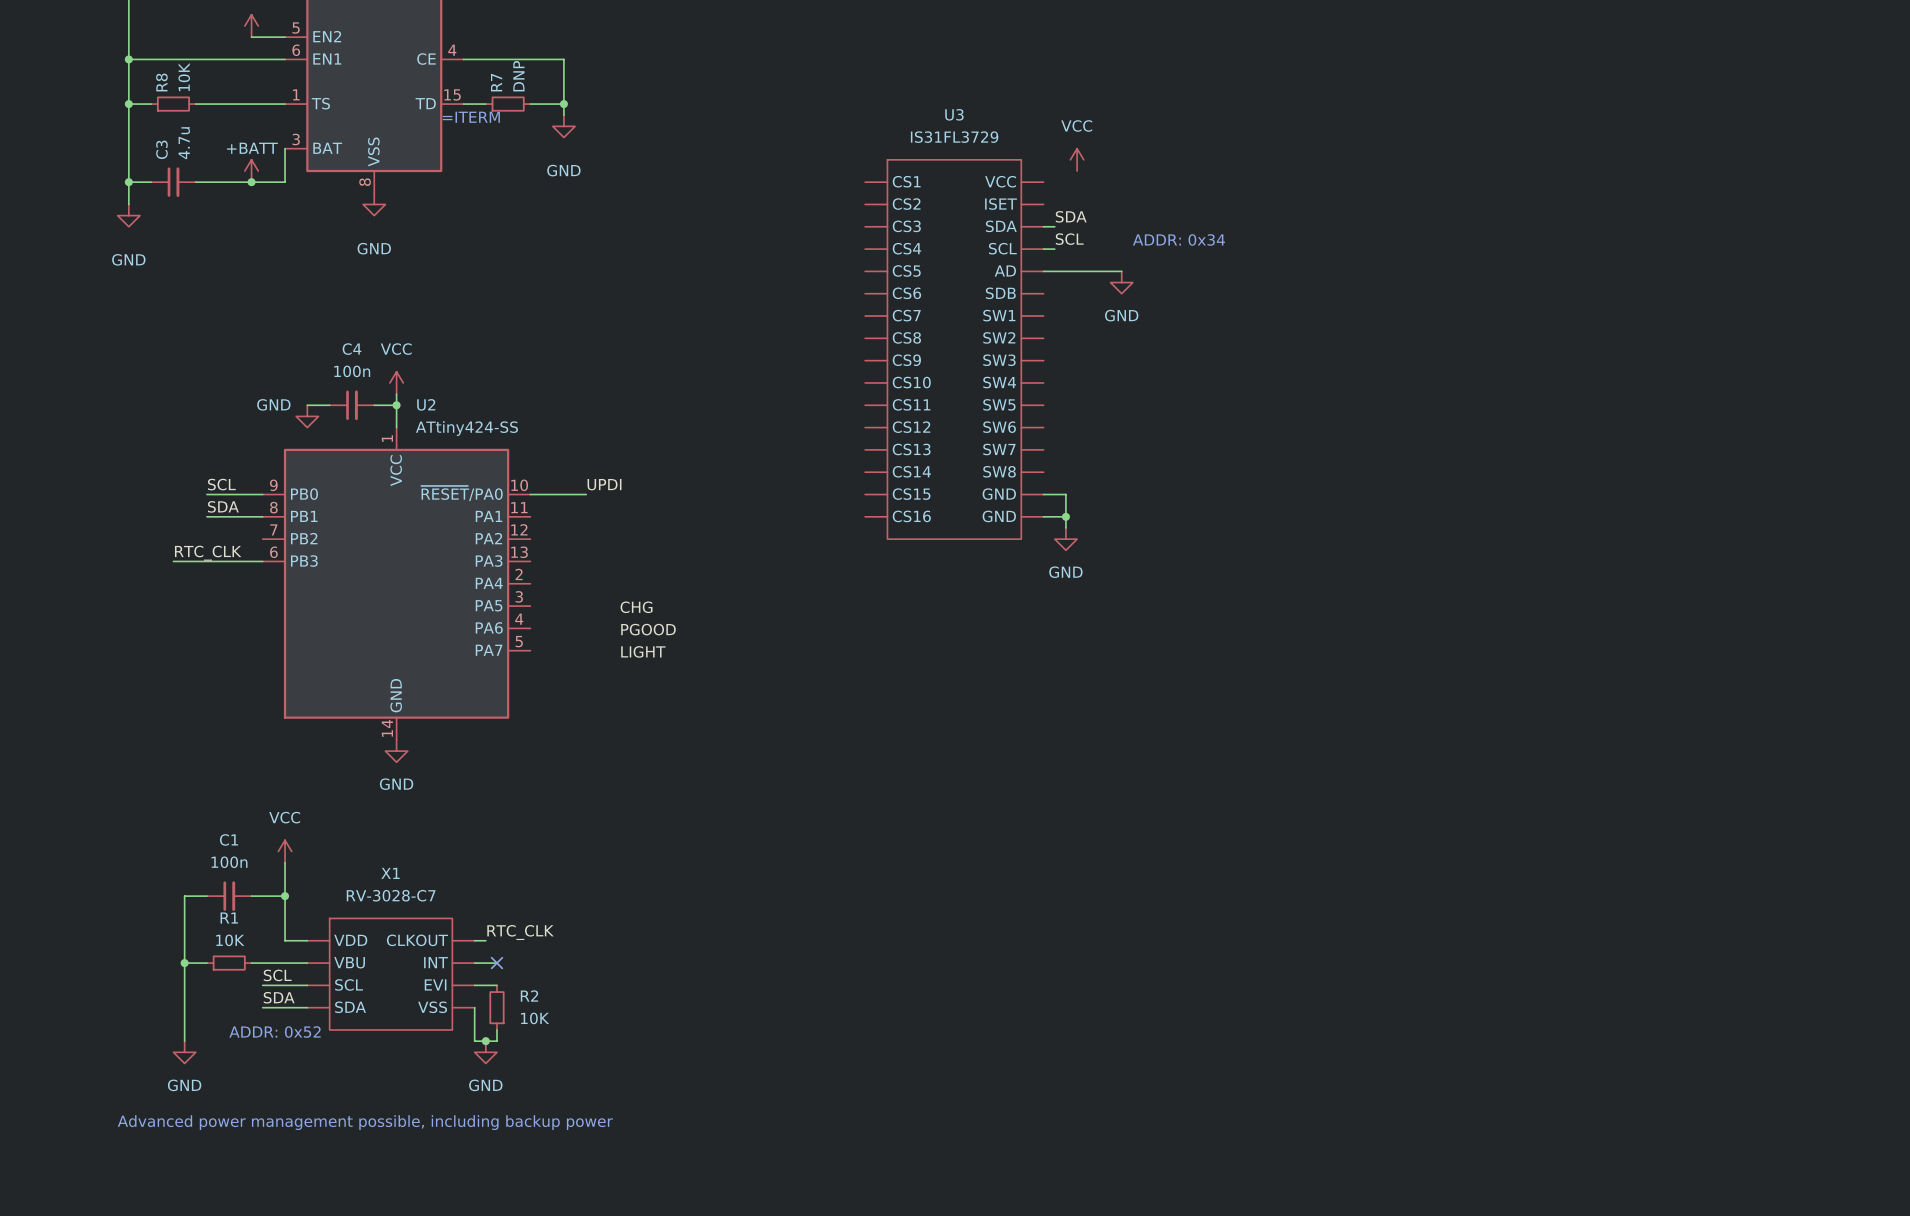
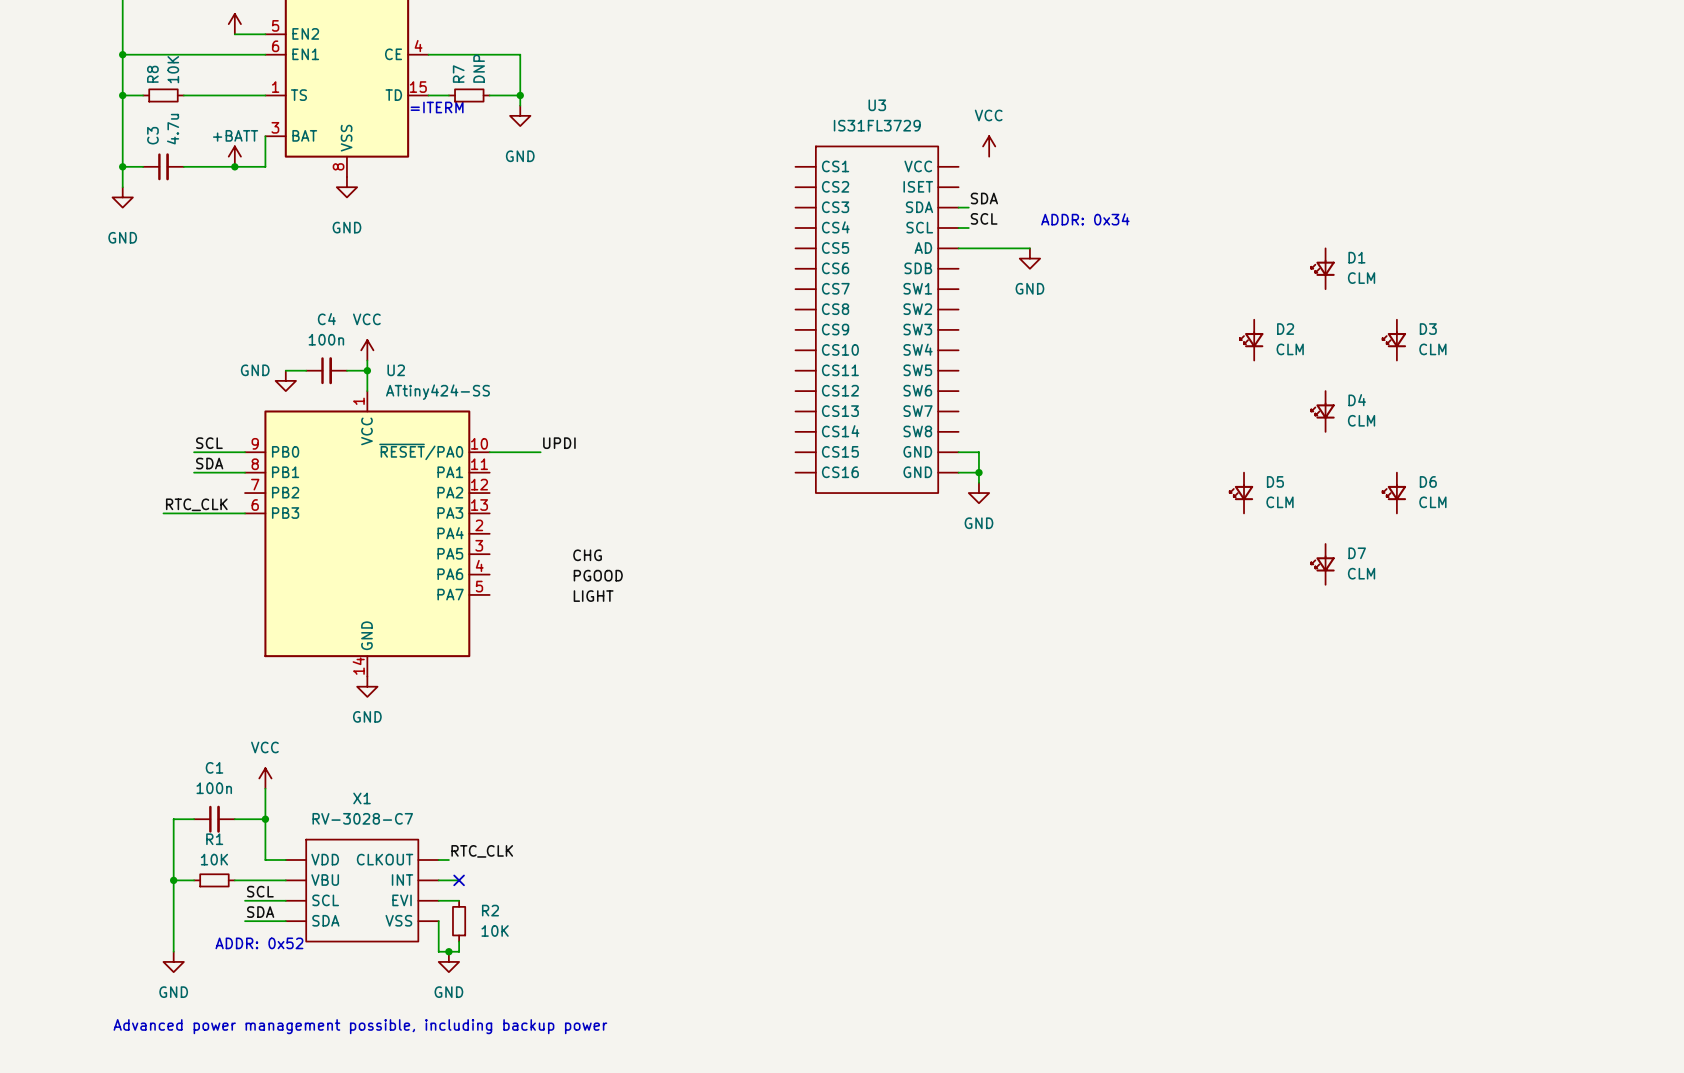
D1: none -> CLM (1323, 268)
D2: none -> CLM (1251, 340)
D3: none -> CLM (1394, 340)
D4: none -> CLM (1323, 411)
D5: none -> CLM (1241, 493)
D6: none -> CLM (1394, 493)
D7: none -> CLM (1323, 564)

